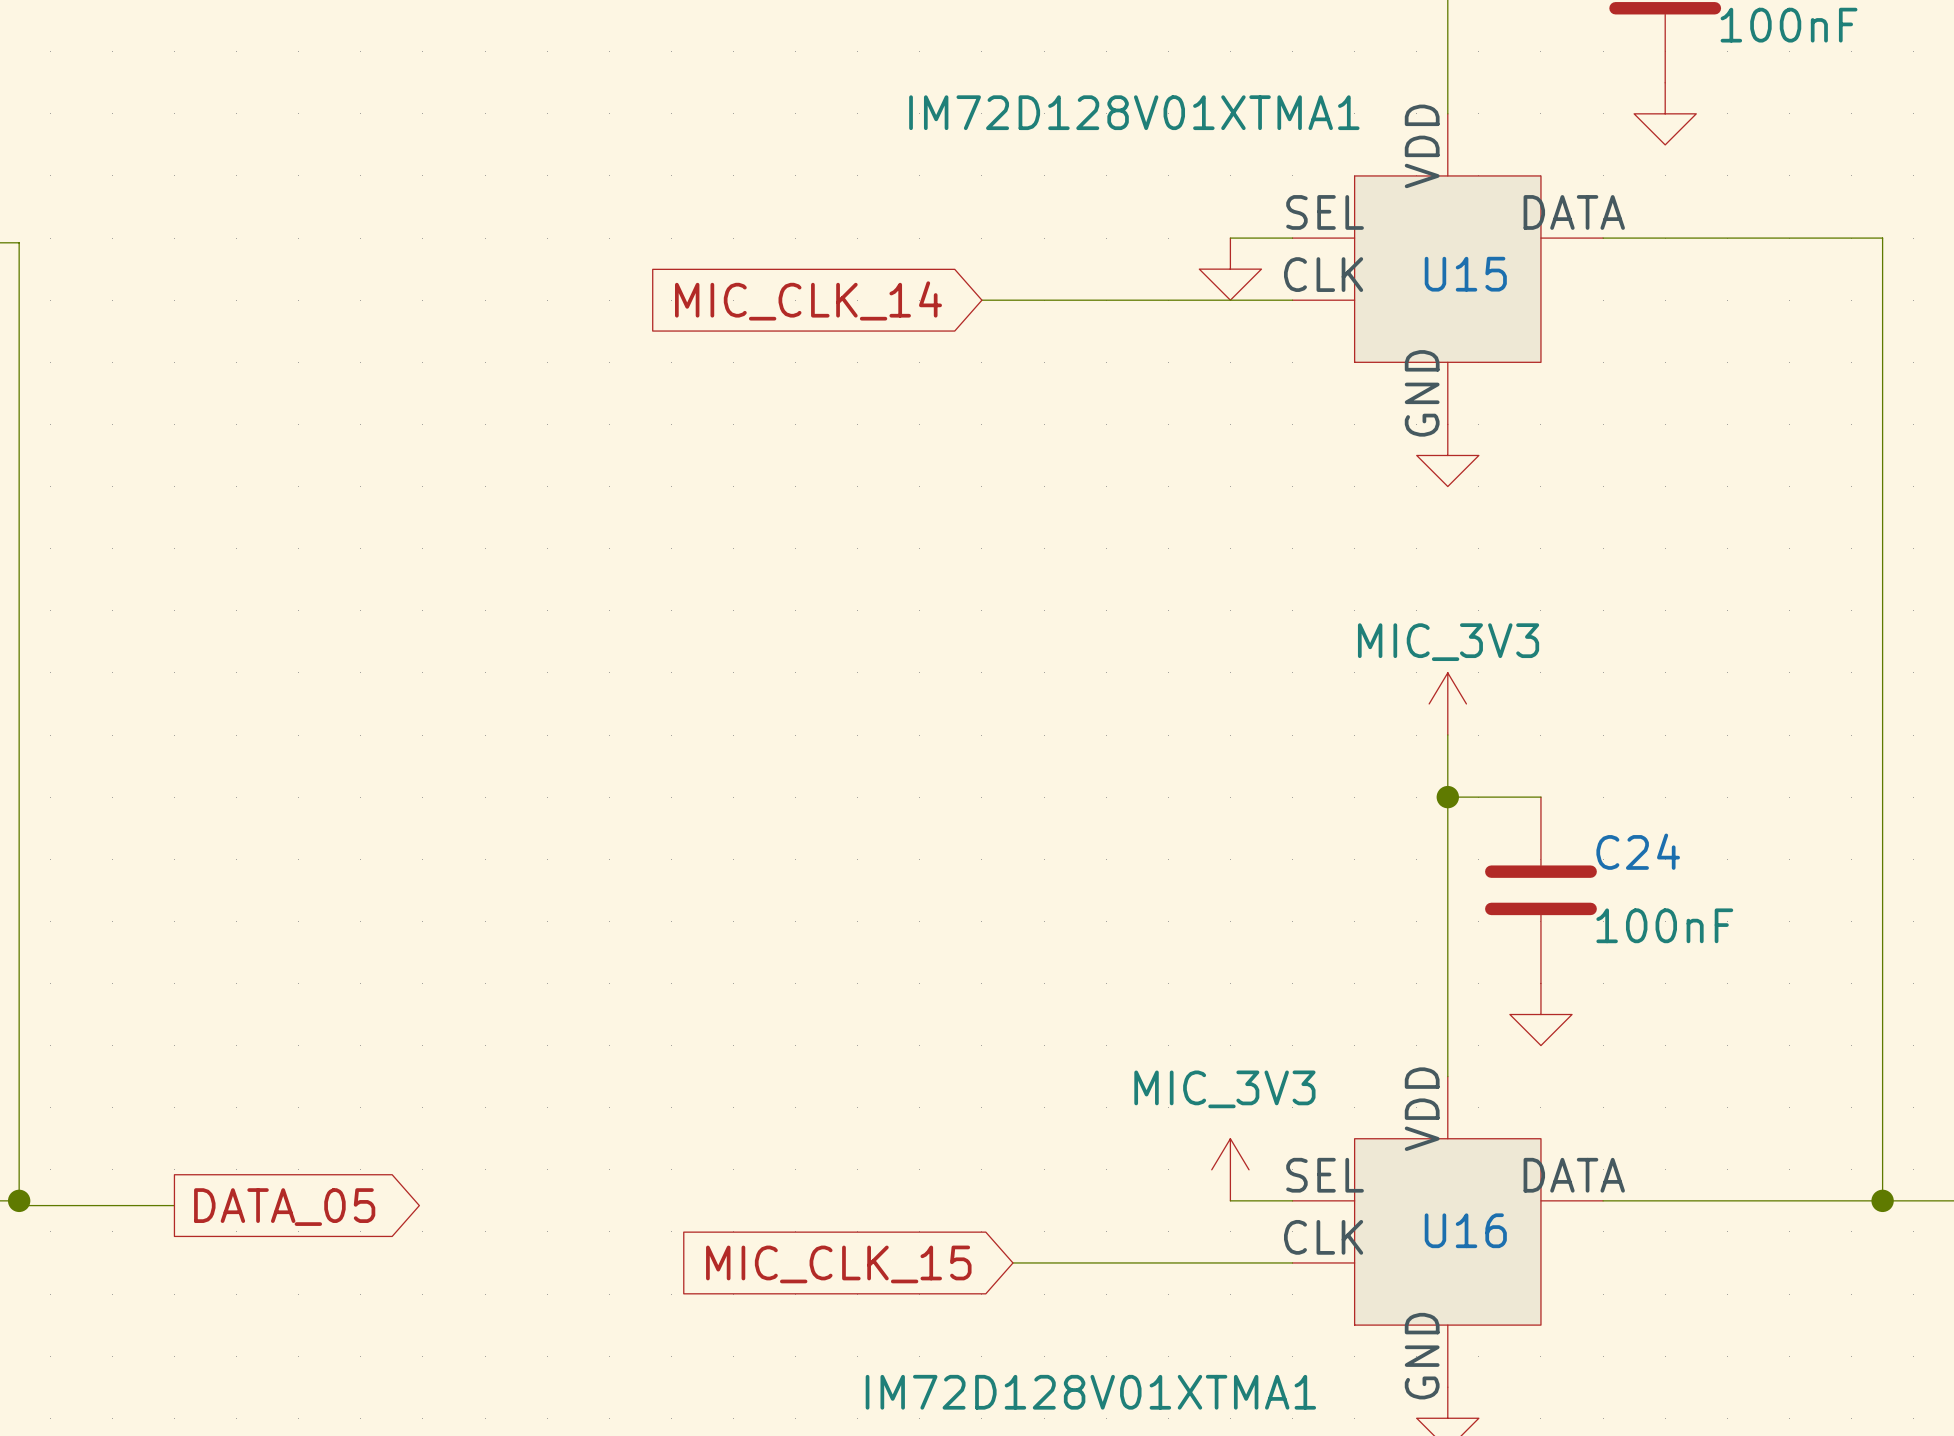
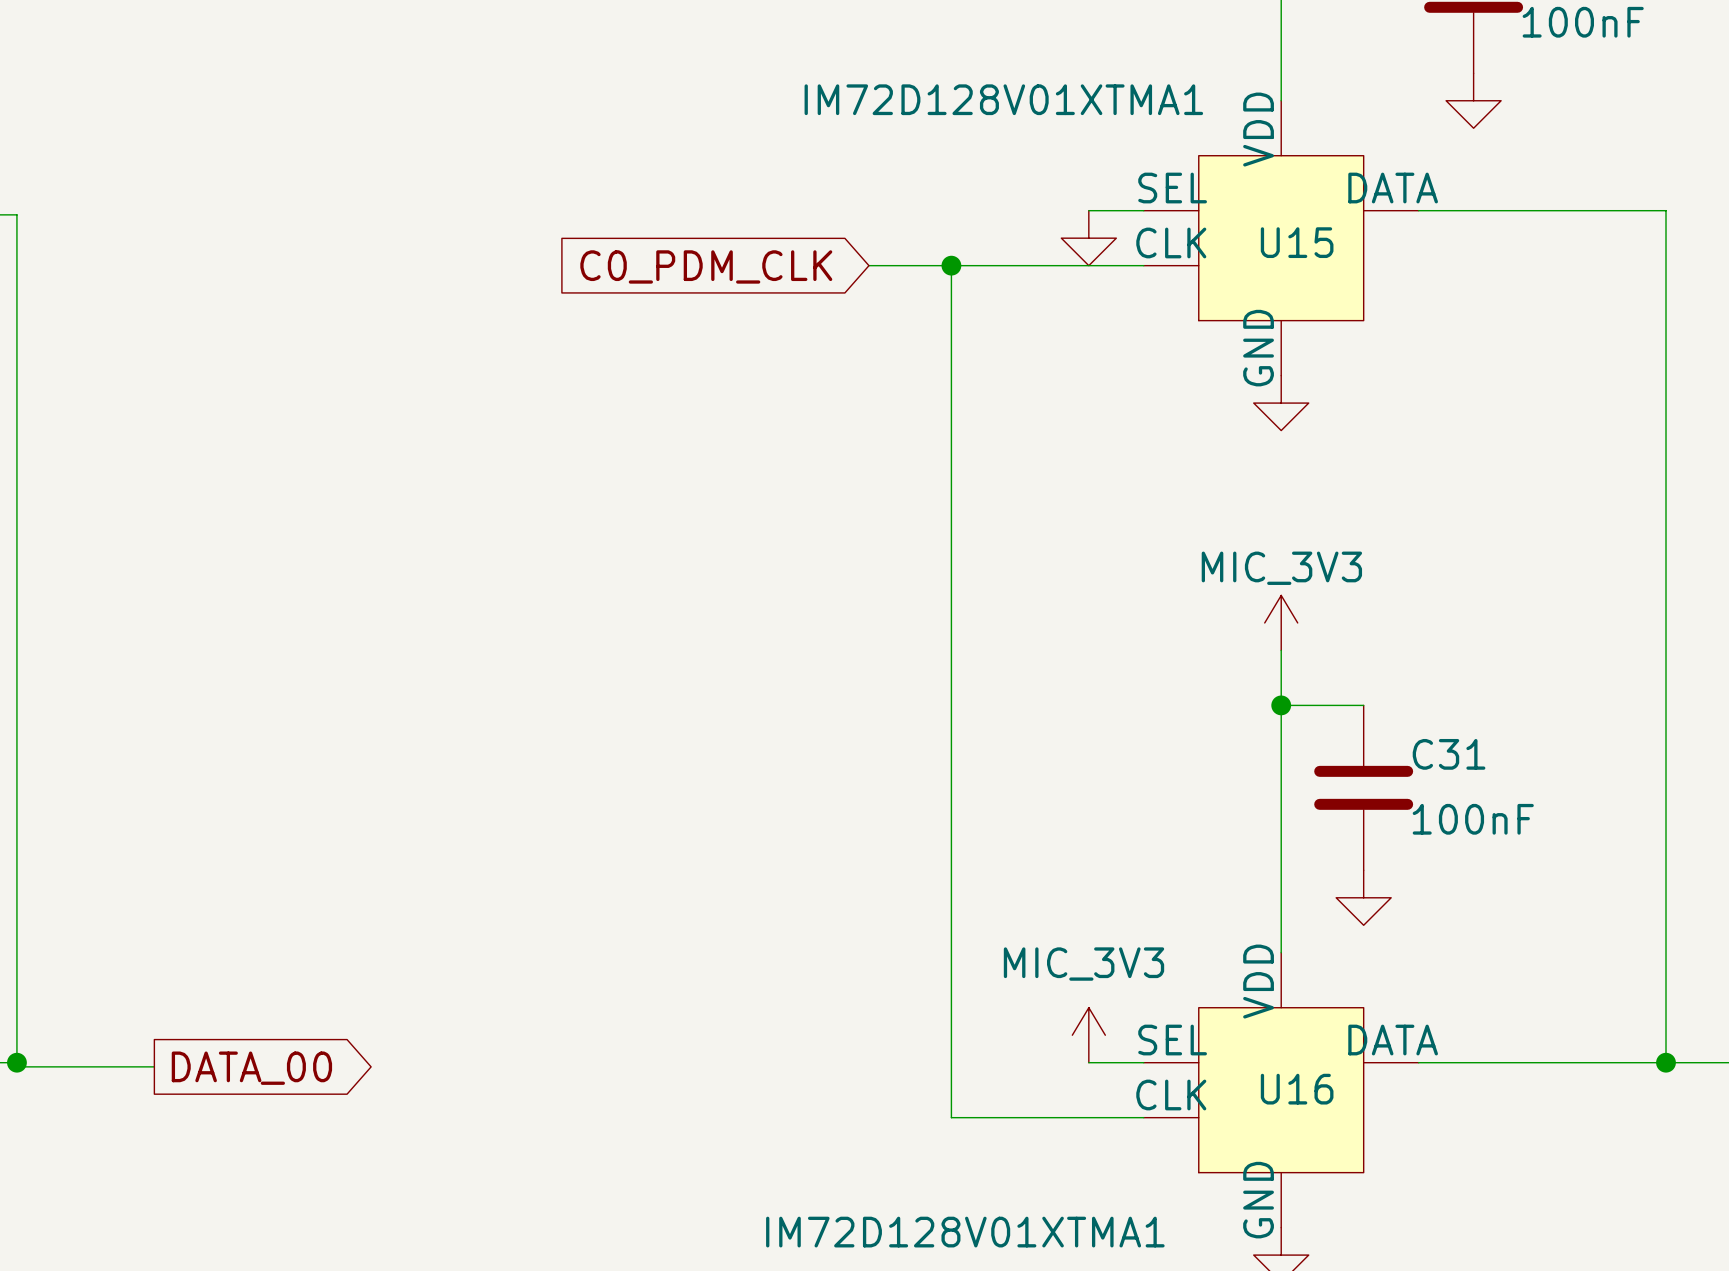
global label: MIC_CLK_14 (808, 300) -> C0_PDM_CLK (706, 266)
junction: none -> (951, 265)
C24 name: C24 (1638, 851) -> C31 (1449, 754)
global label: DATA_05 (284, 1207) -> DATA_00 (251, 1068)
wire: (1012, 1262) (1075, 1262) -> (951, 265) (951, 1117)
global label: MIC_CLK_15 (838, 1264) -> none

